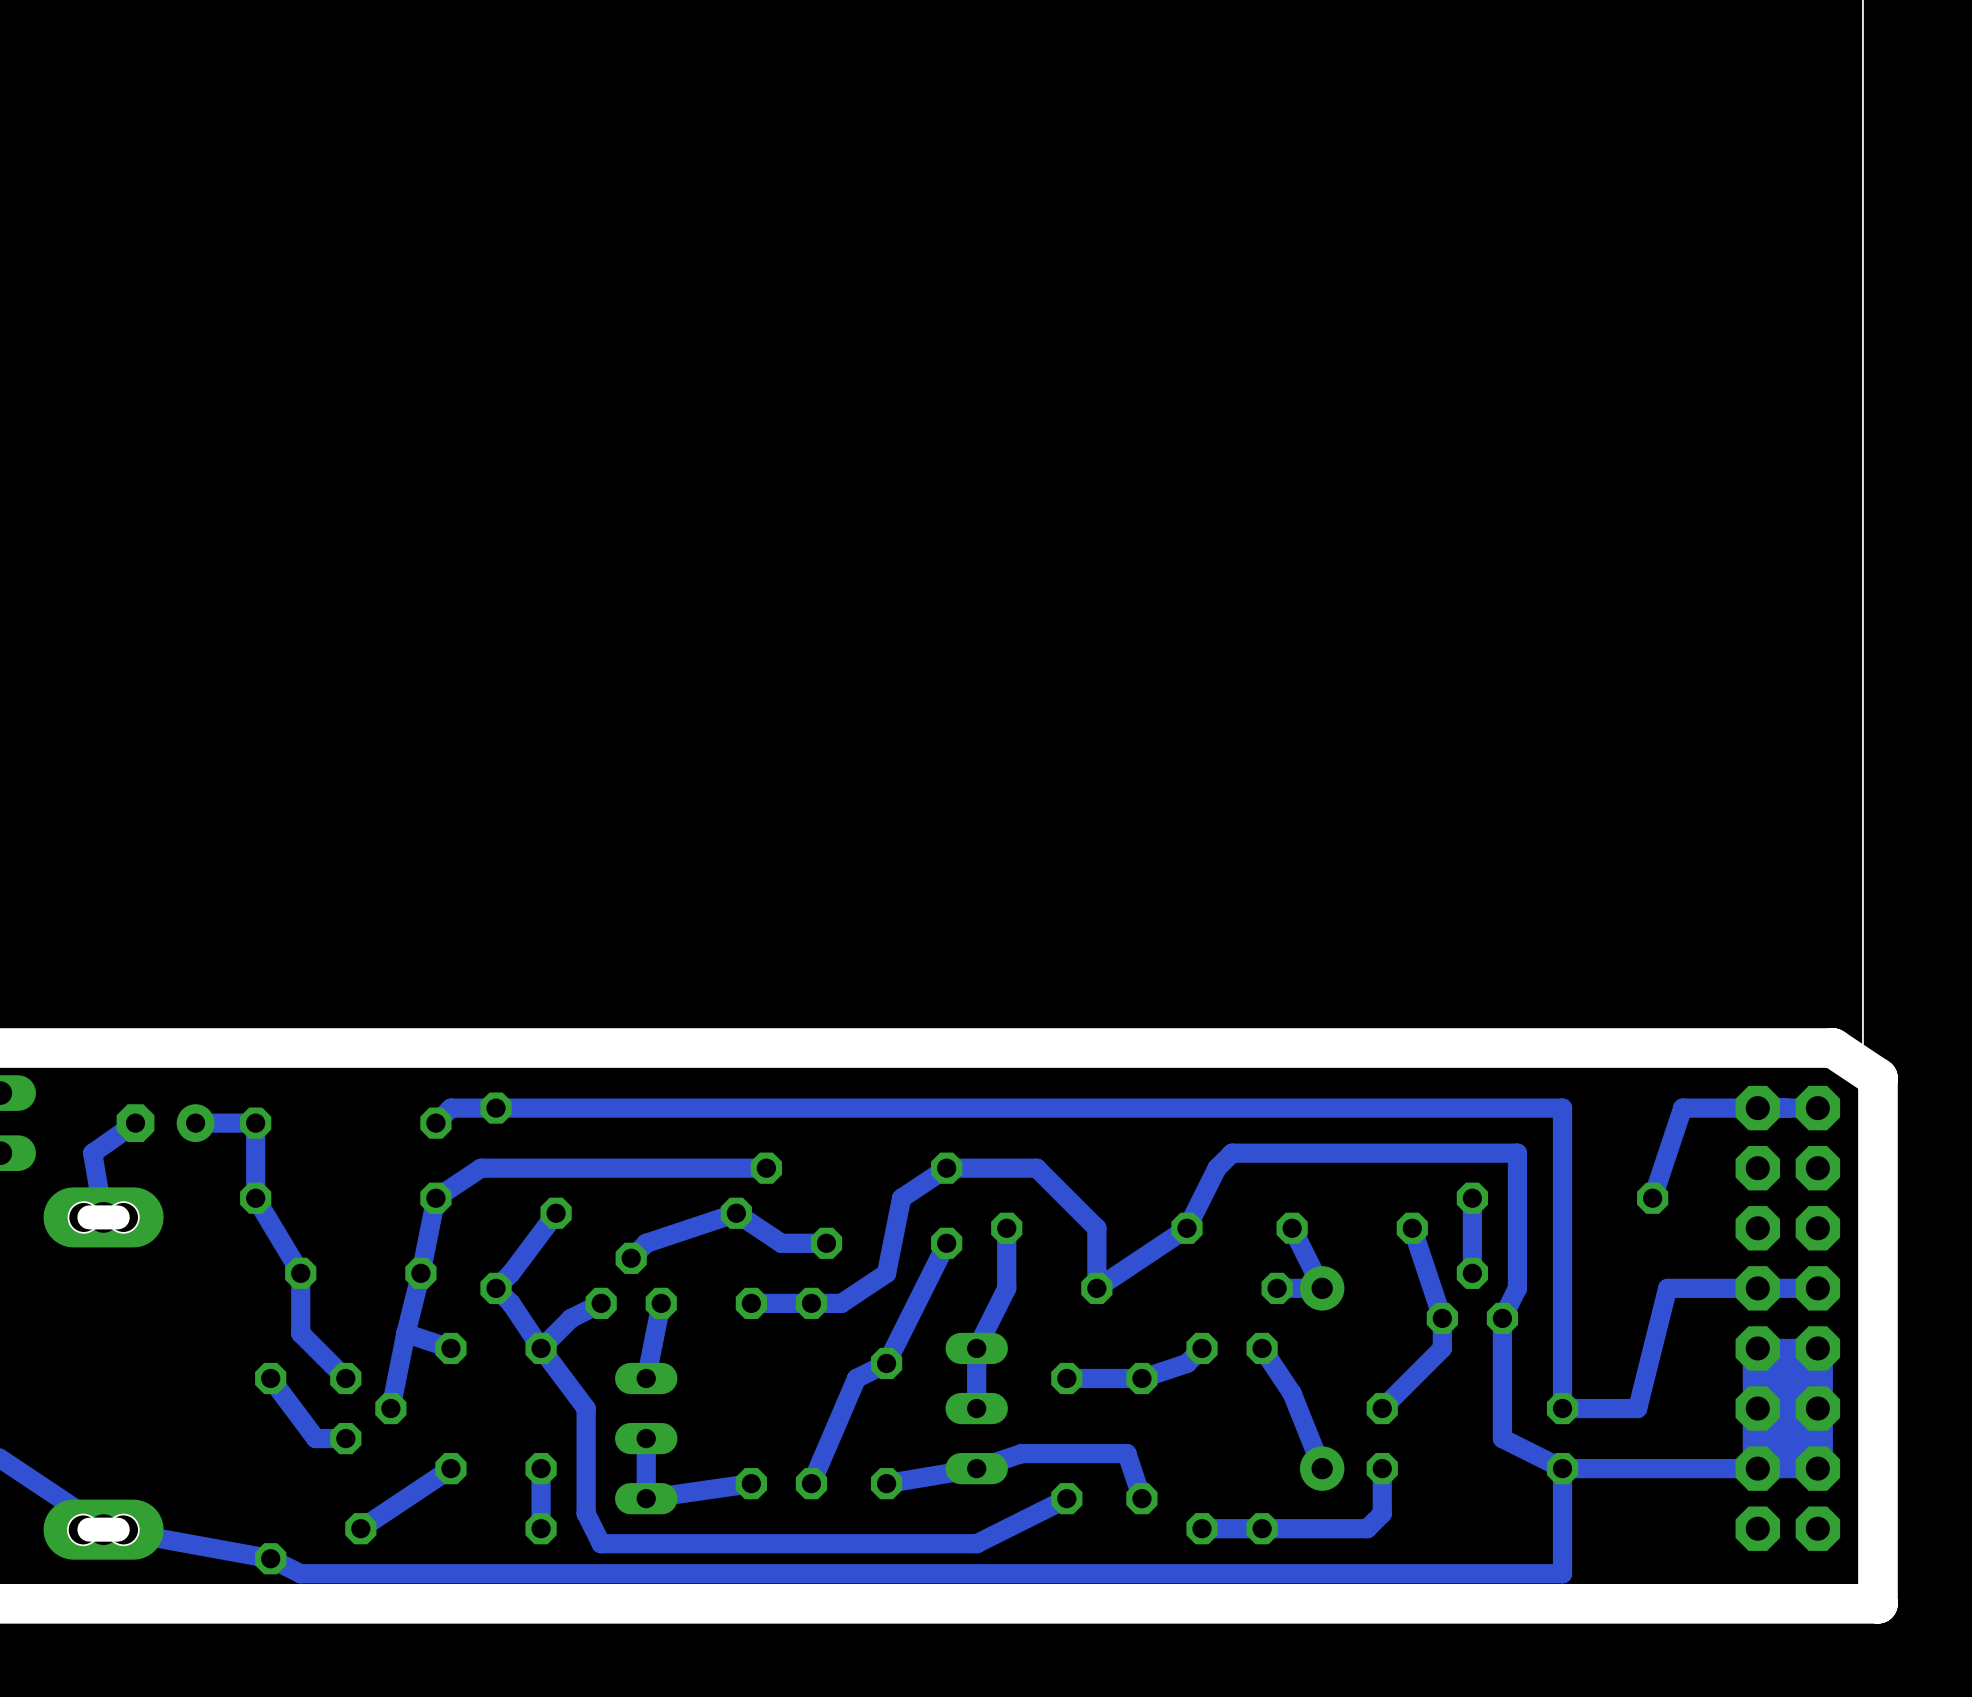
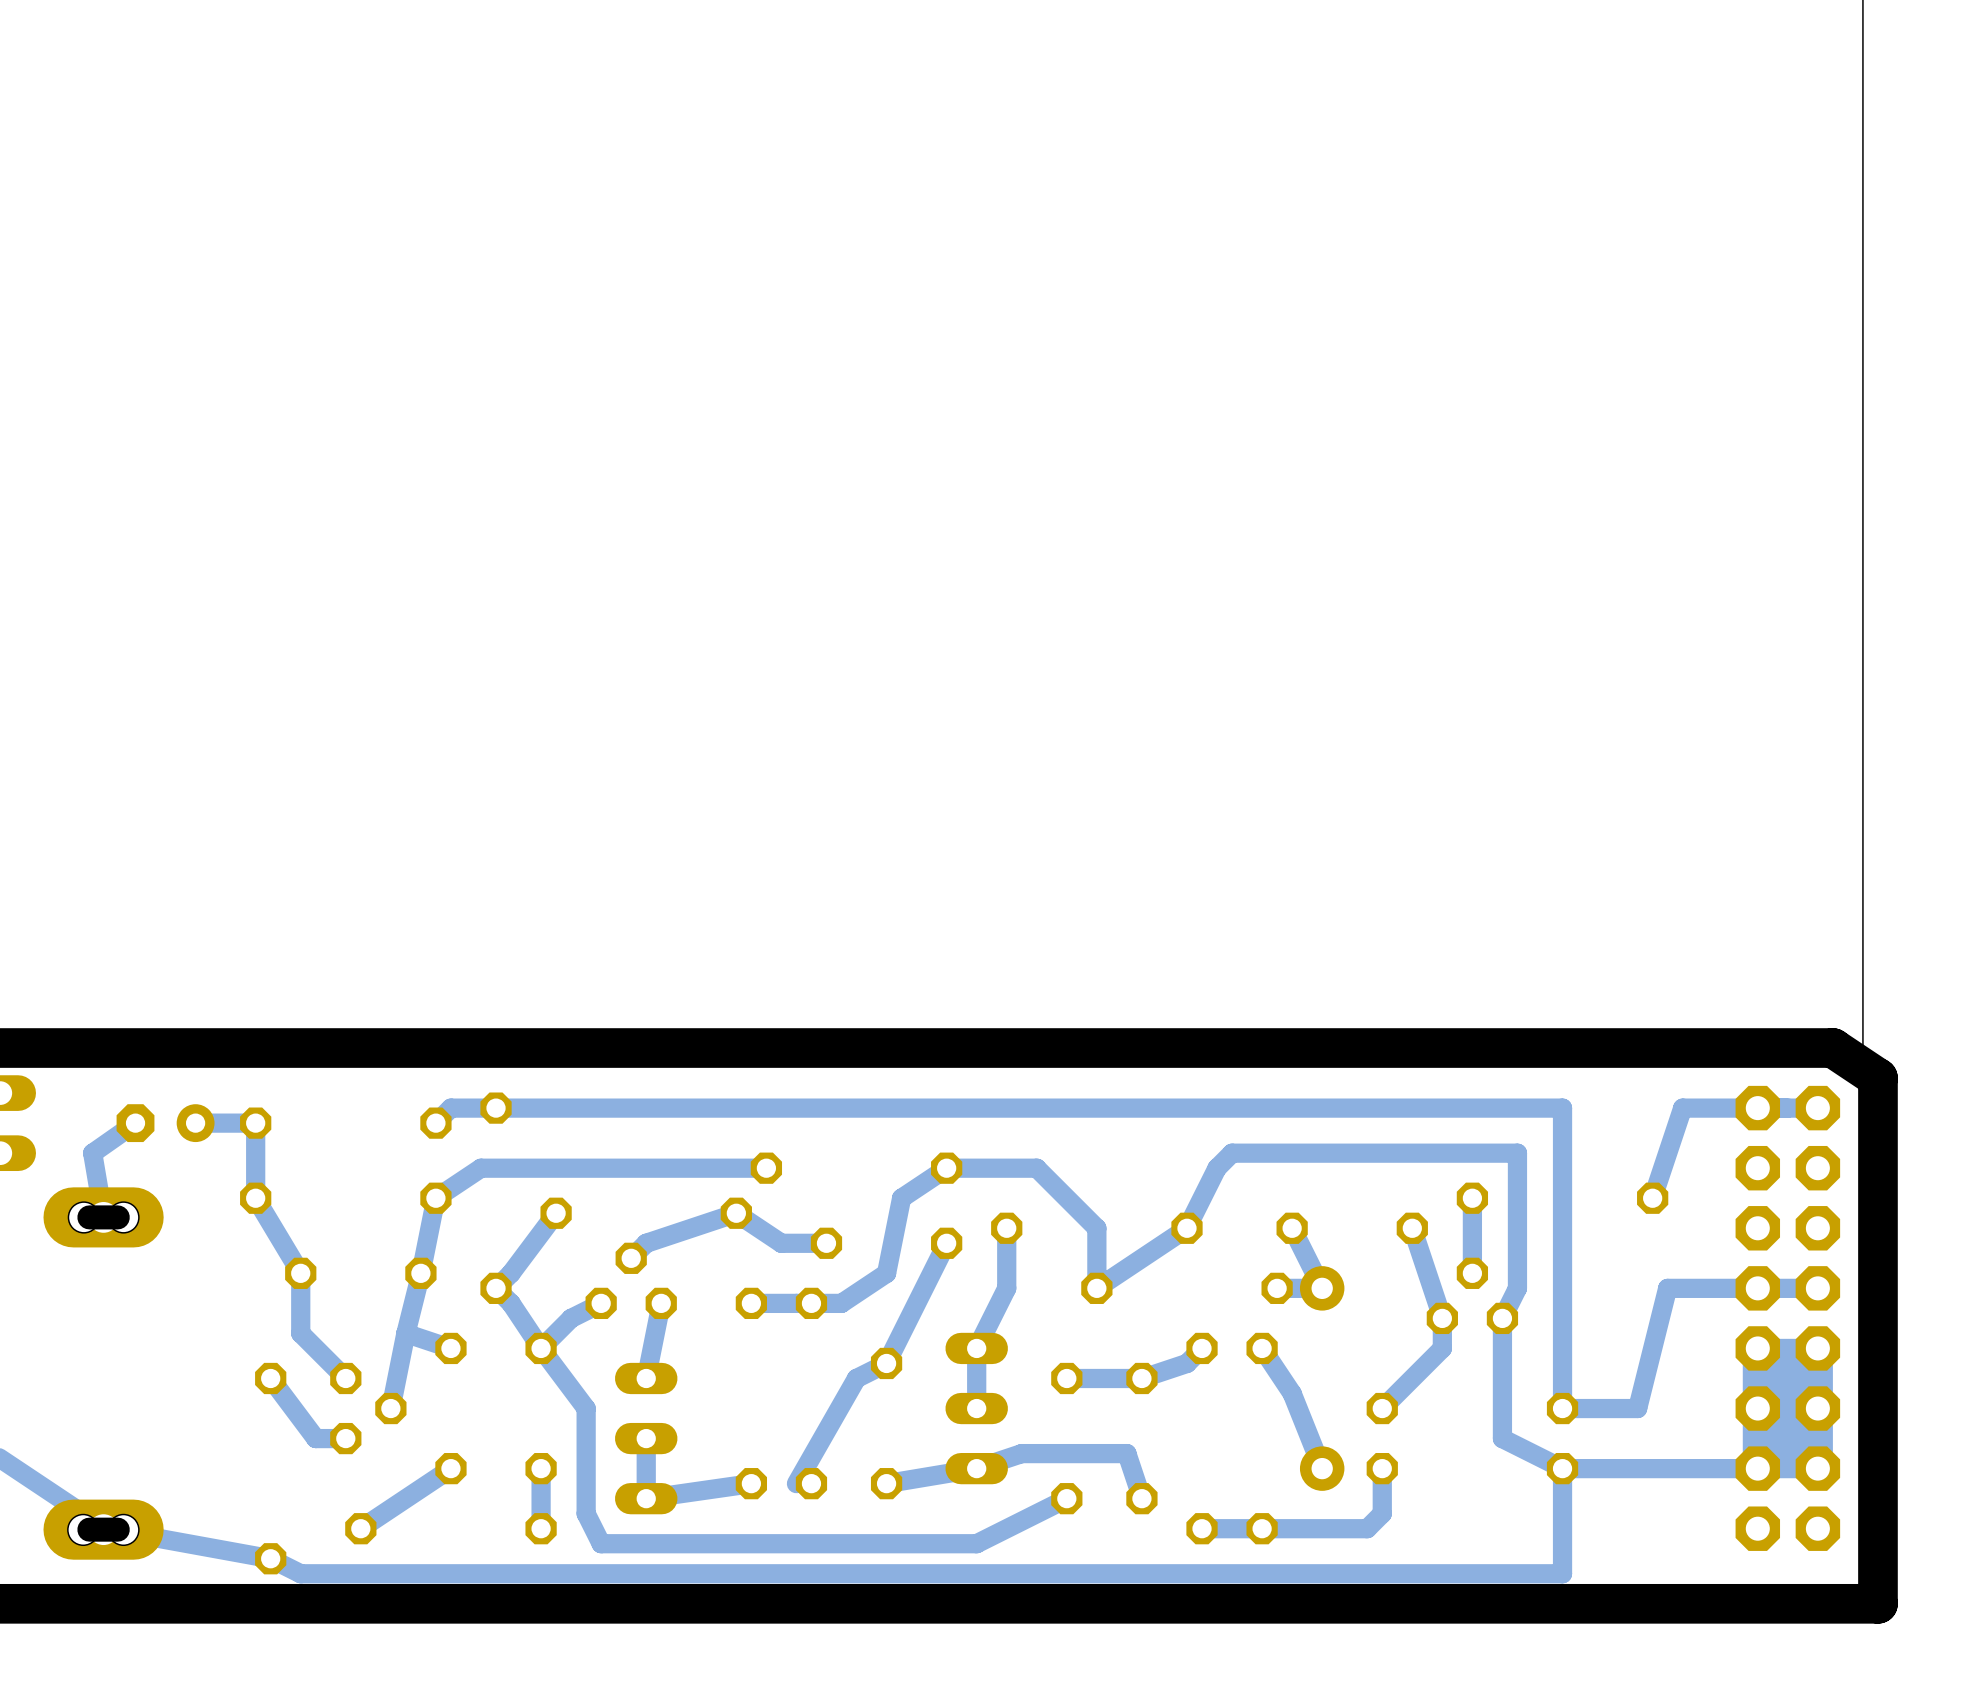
track: (856, 1378) (811, 1483) -> (856, 1378) (796, 1483)

